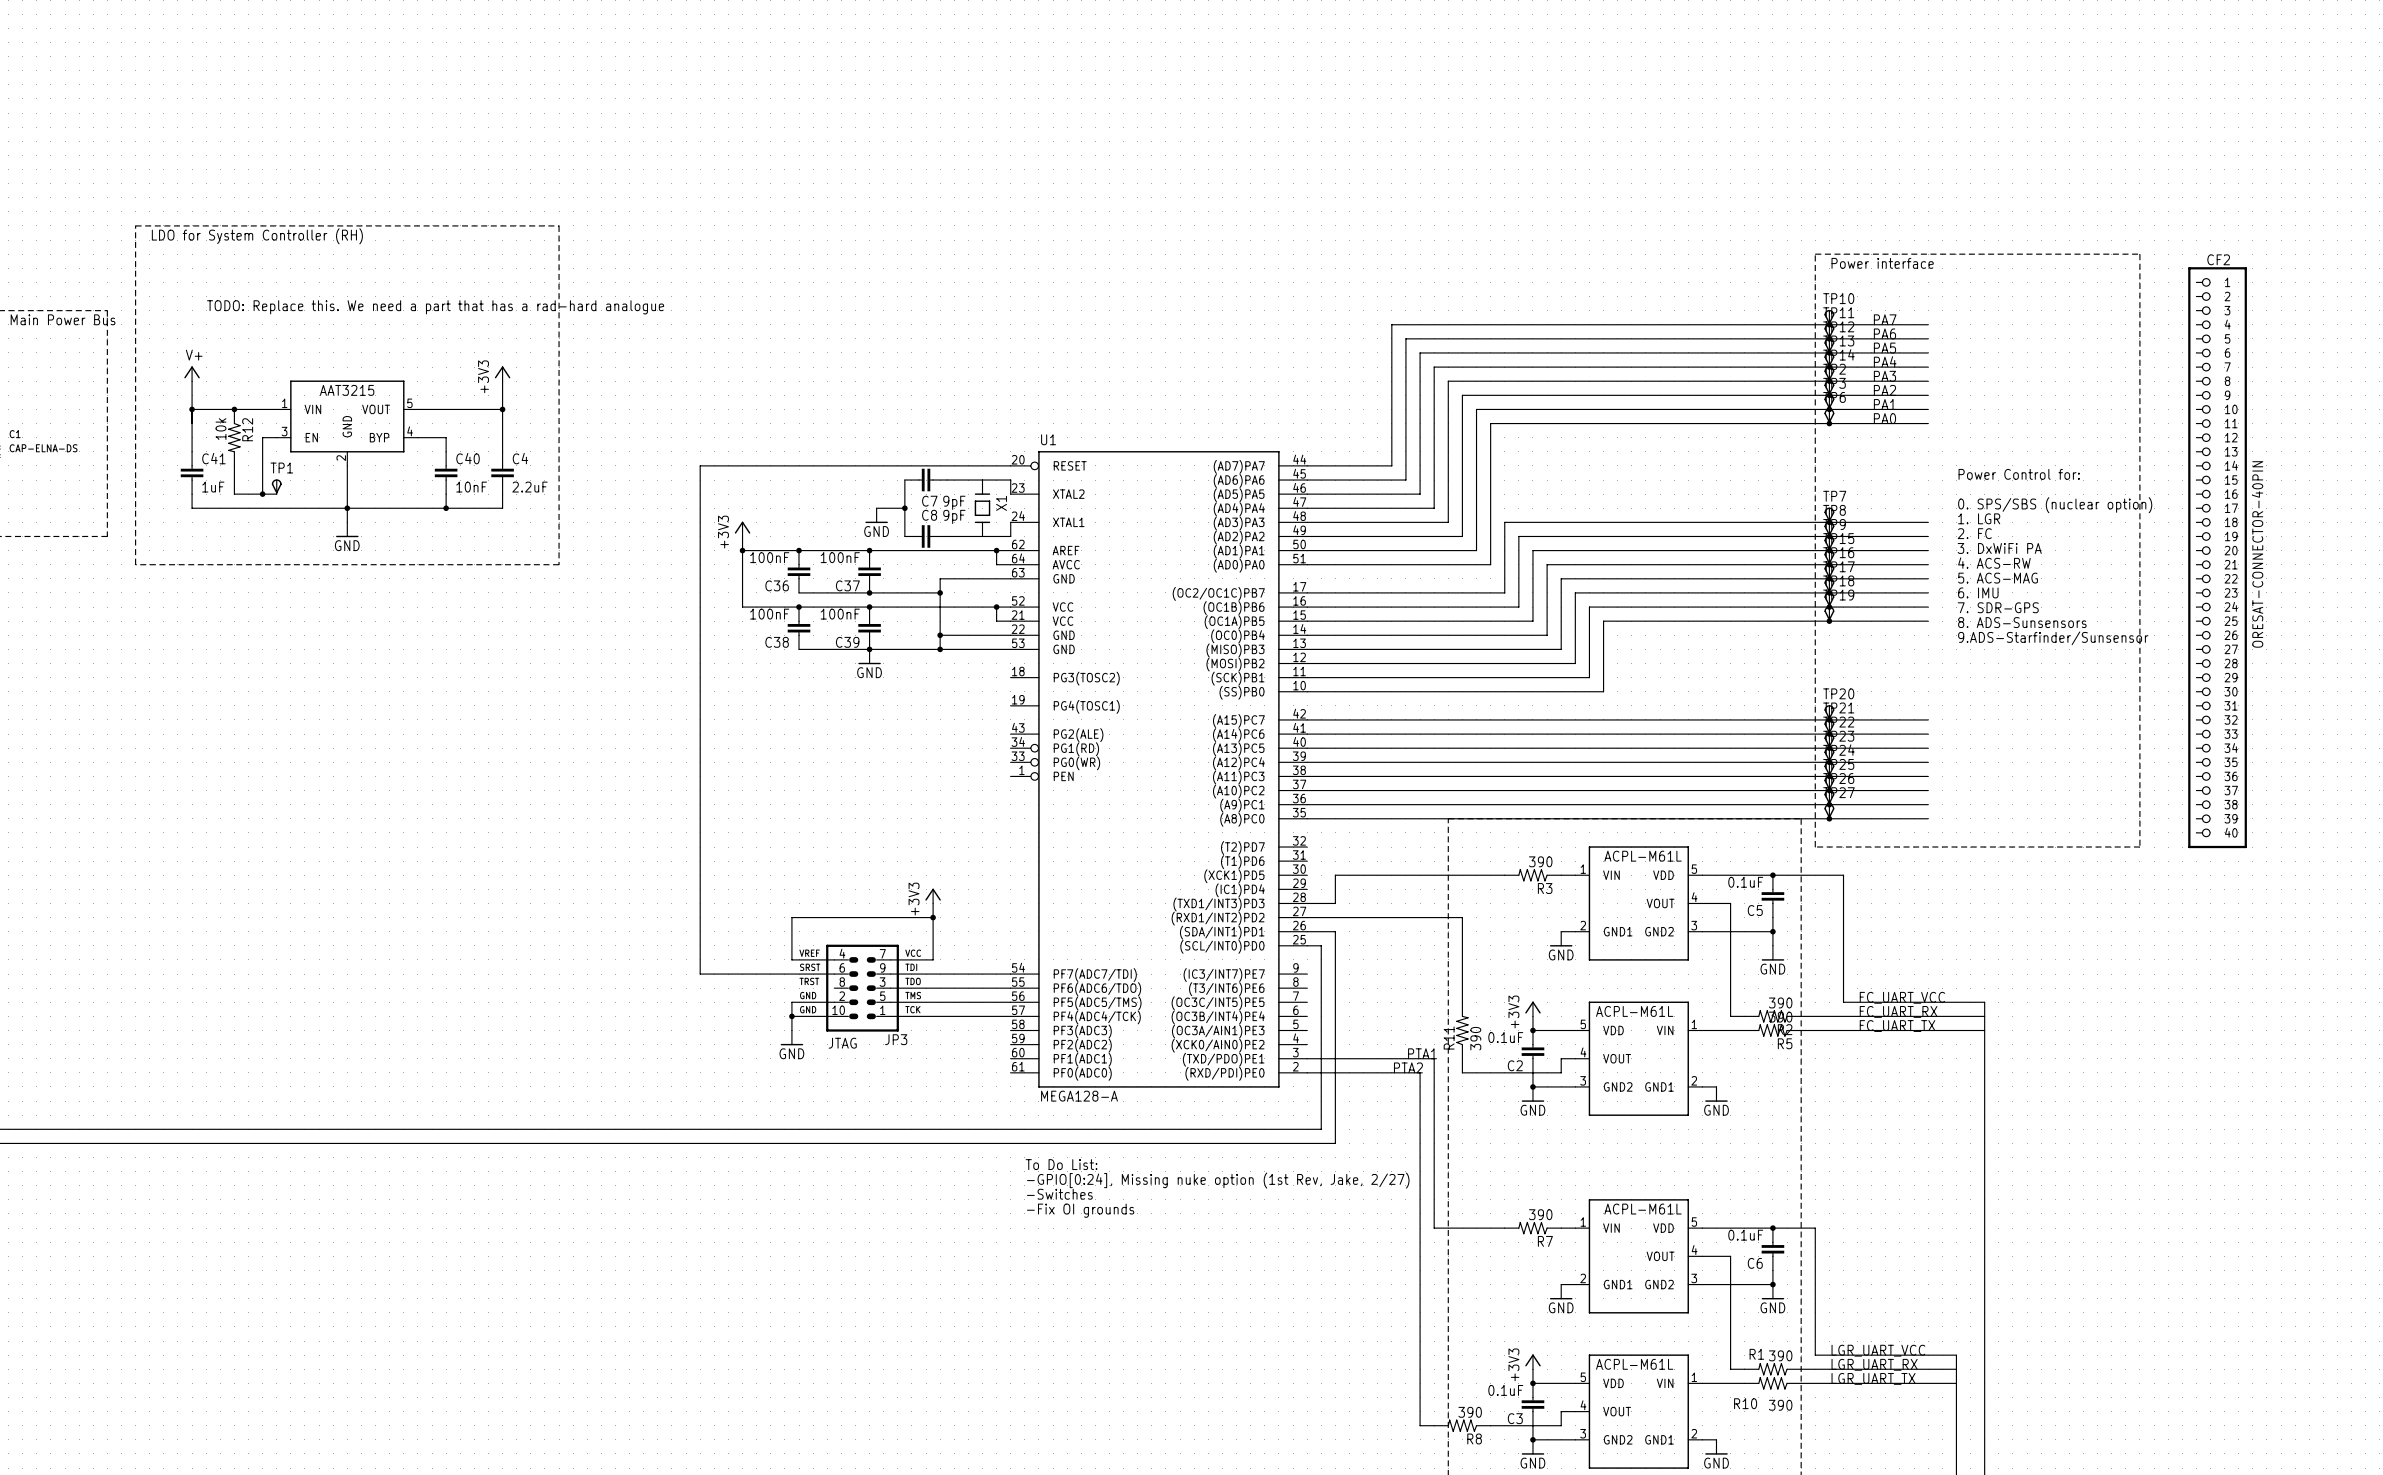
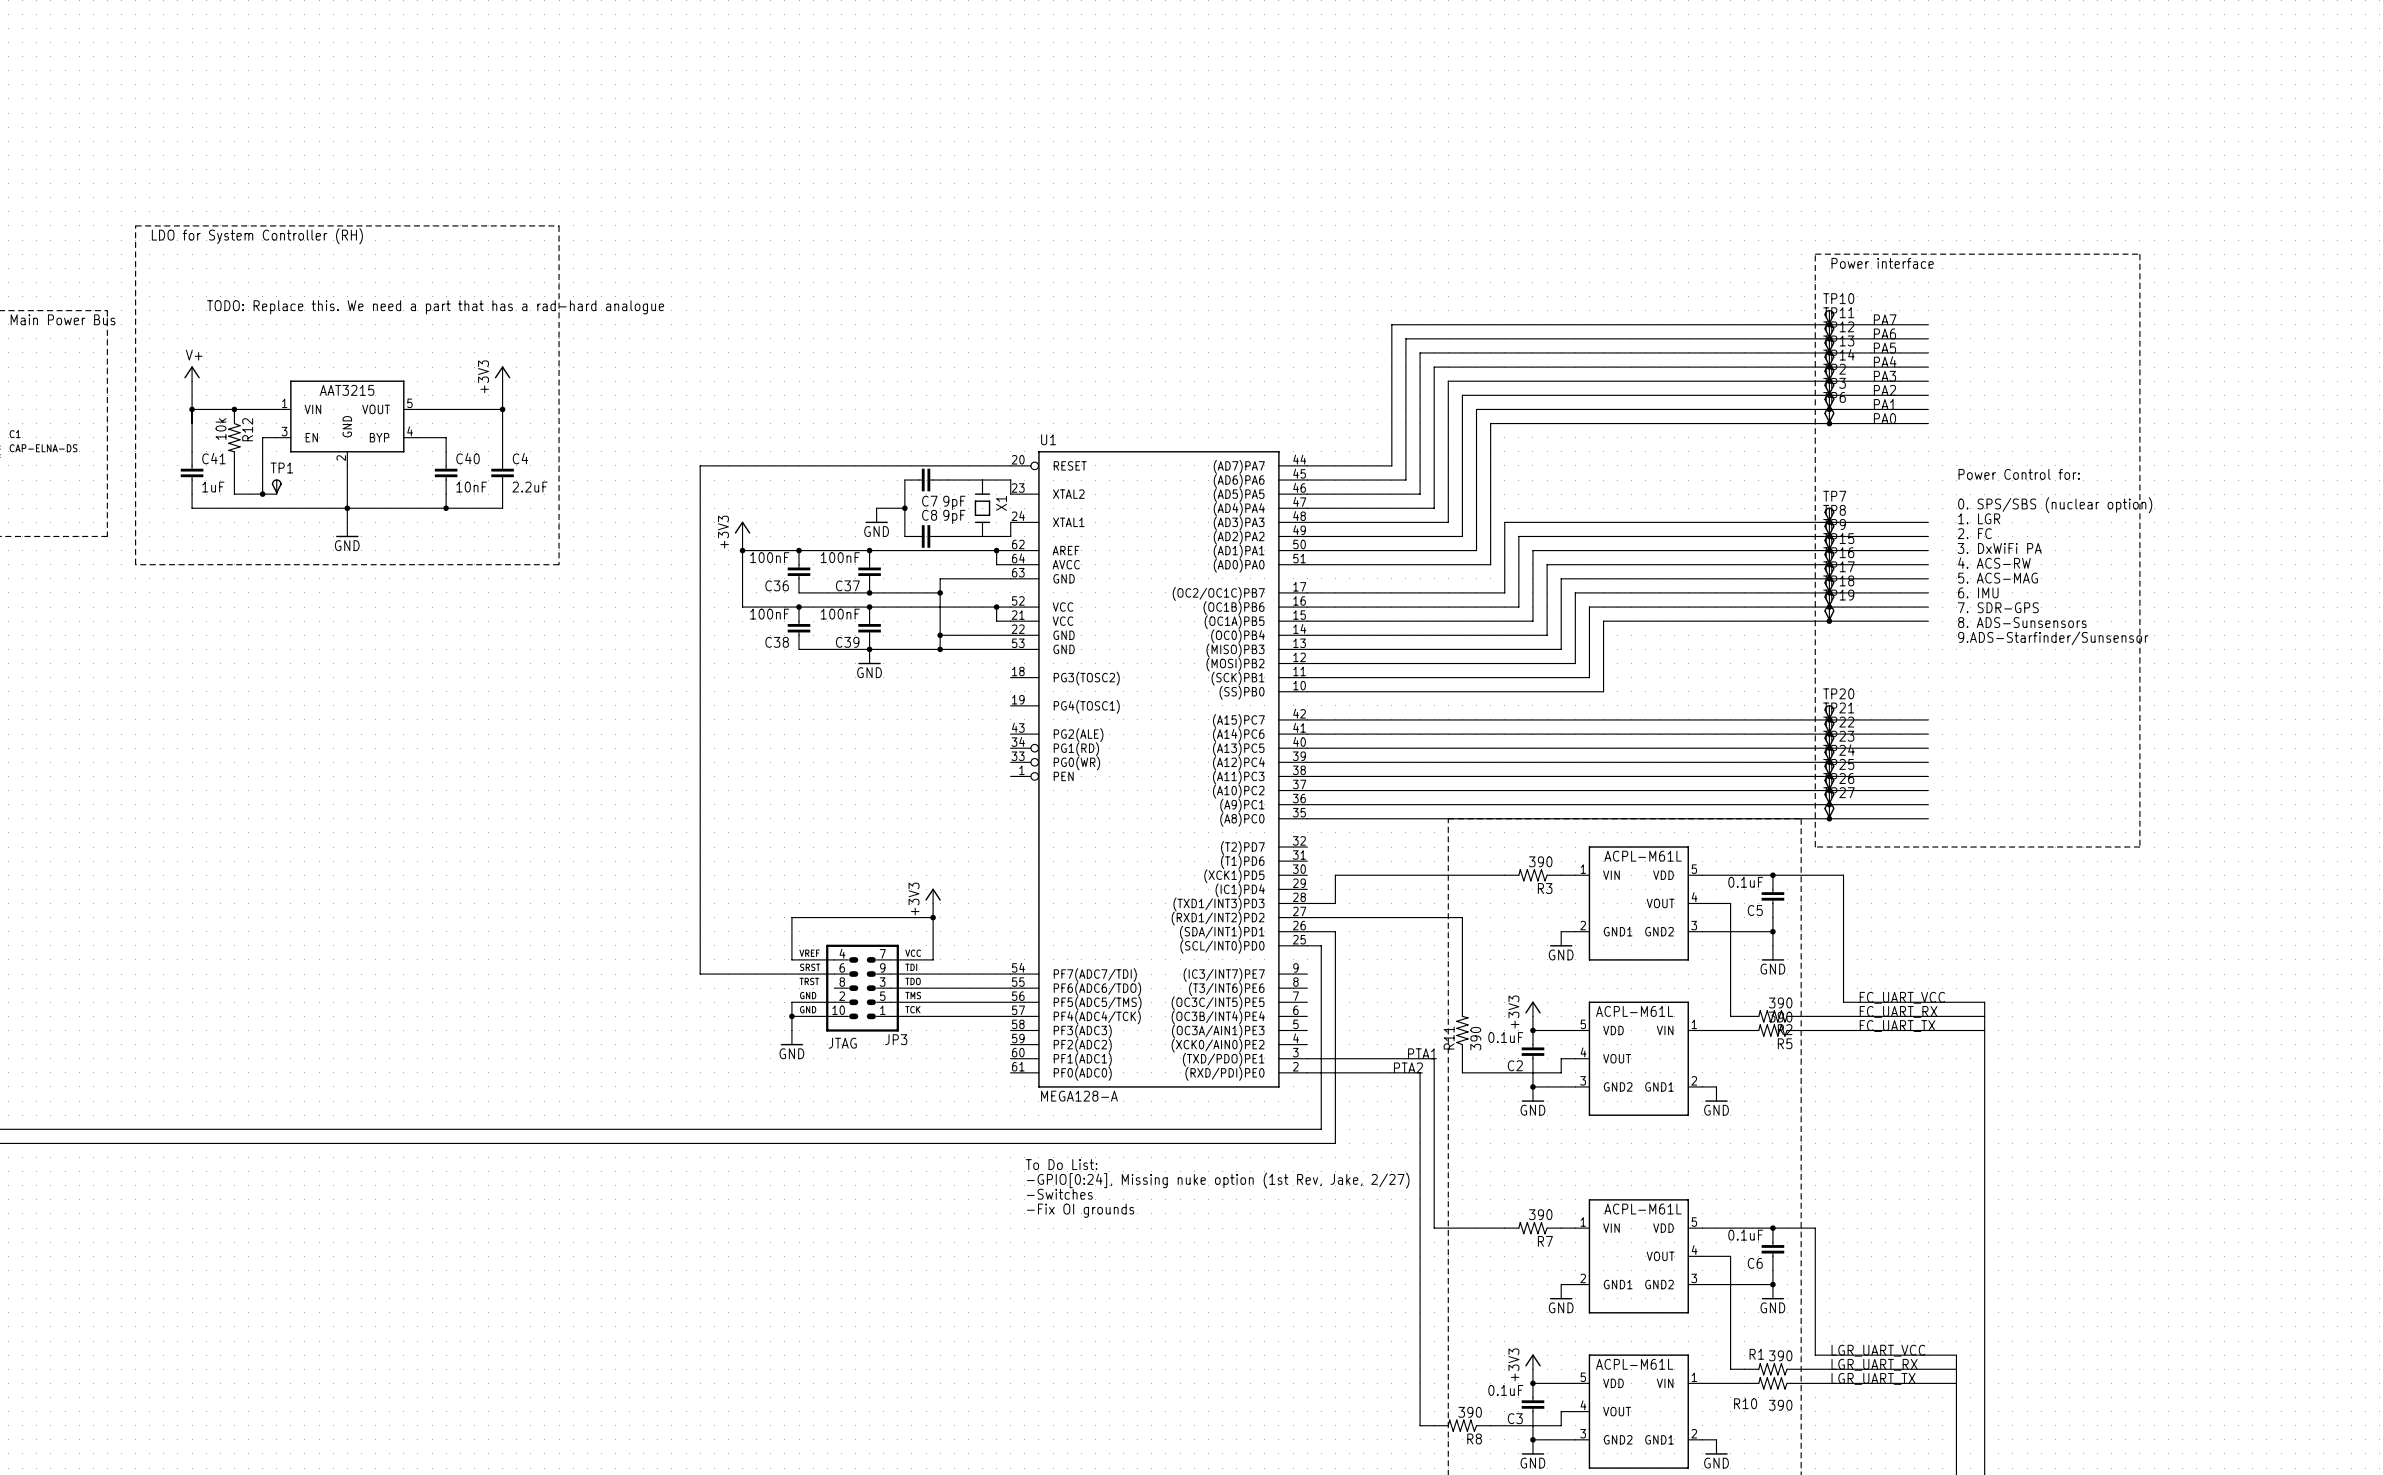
CF2: ORESAT-CONNECTOR-40PIN (2217, 557) -> none

